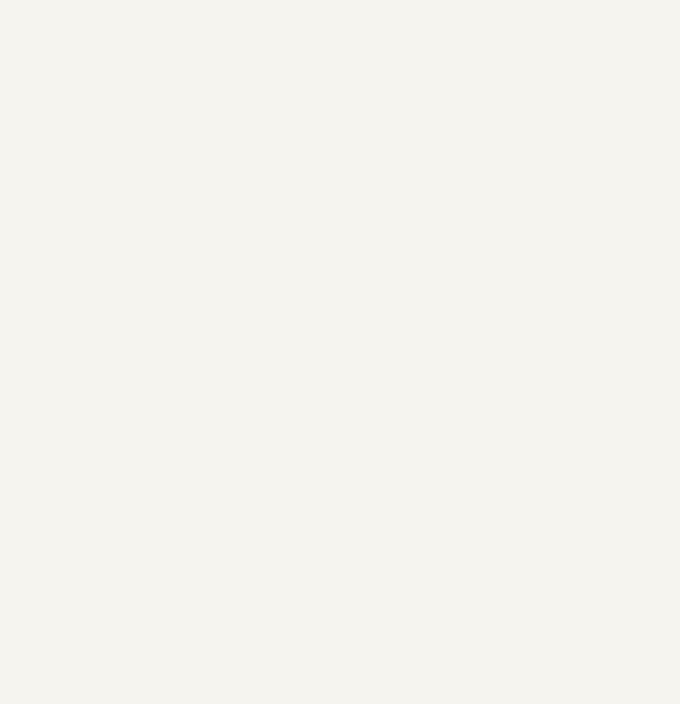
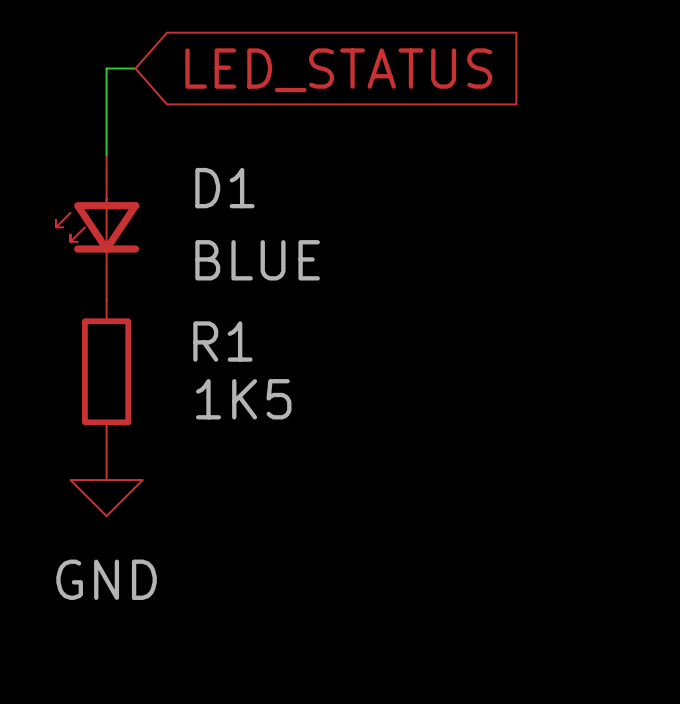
wire: none -> (135, 68) (106, 68) (106, 155)
global label: none -> LED_STATUS (338, 70)
D1: none -> BLUE (97, 227)
R1: none -> 1K5 (106, 371)
power symbol: none -> GND (106, 480)

